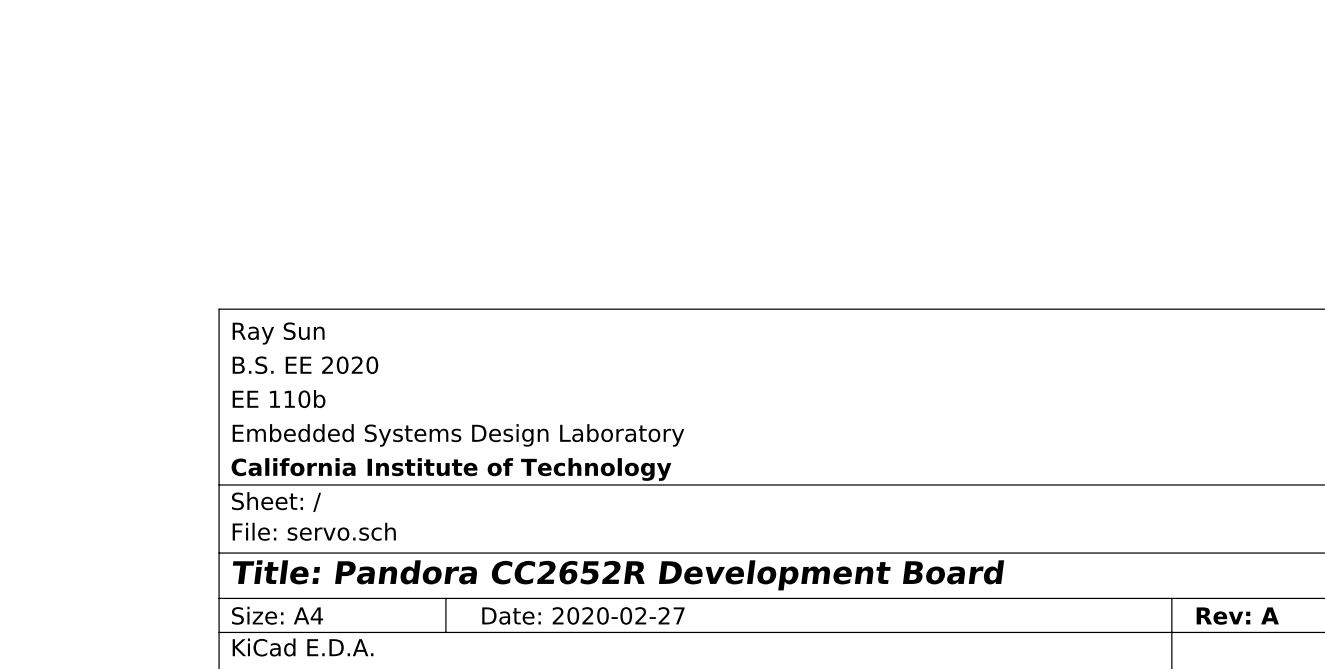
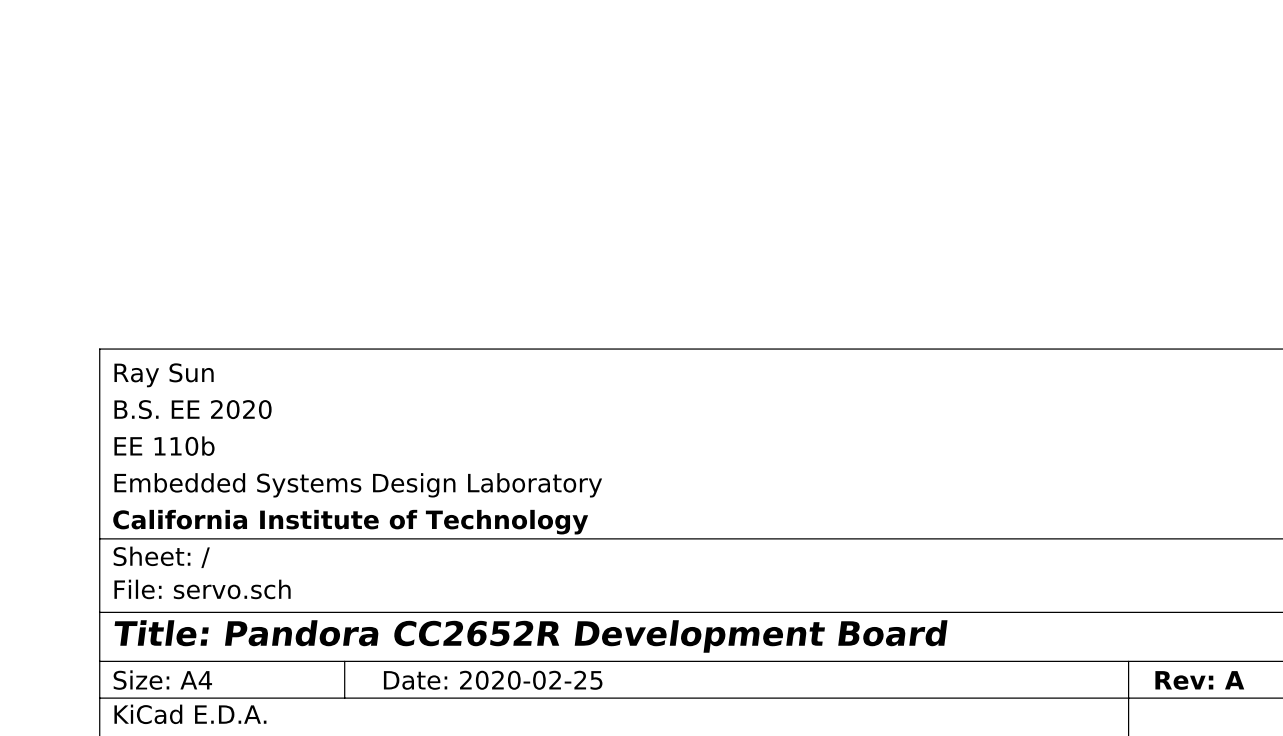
title block: Date: 2020-02-27 (583, 615) -> Date: 2020-02-25 (493, 680)

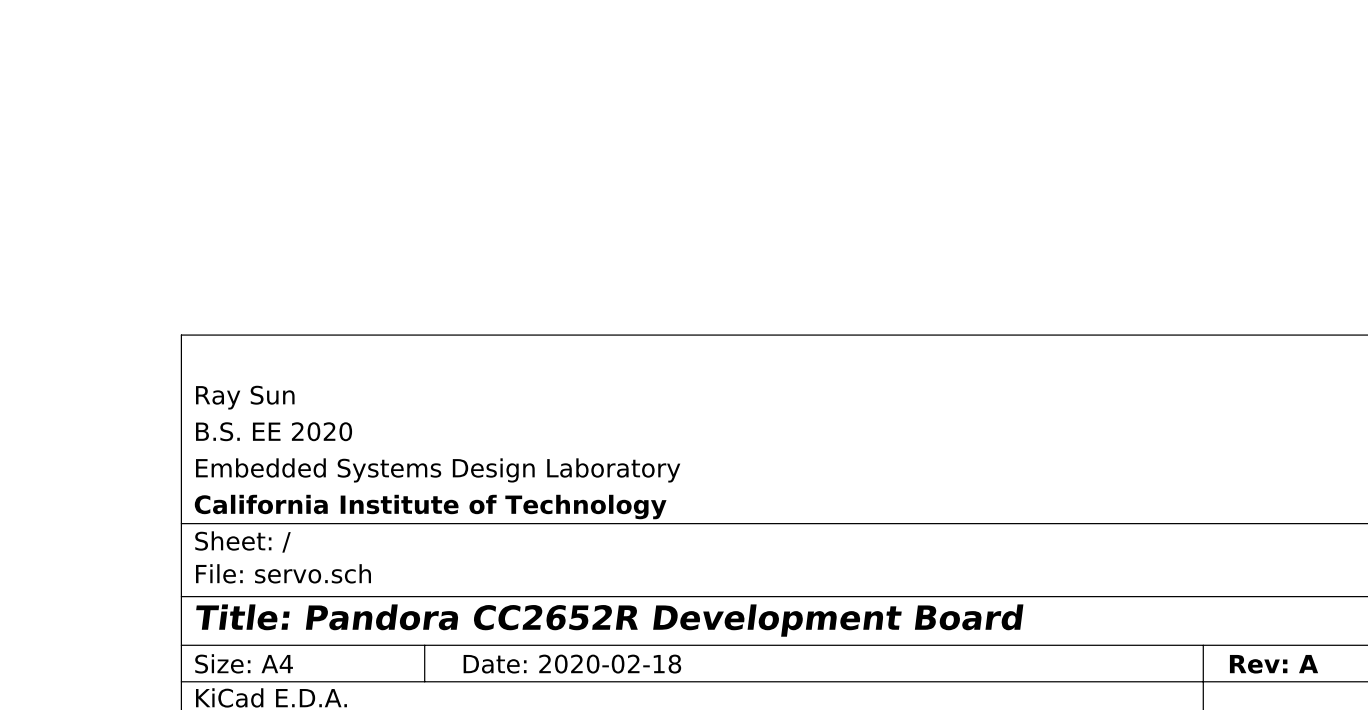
title block: Ray Sun (164, 375) -> none
title block: B.S. EE 2020 (193, 409) -> Ray Sun (245, 397)
title block: EE 110b (164, 446) -> B.S. EE 2020 (274, 431)
title block: Date: 2020-02-25 (493, 680) -> Date: 2020-02-18 (572, 664)

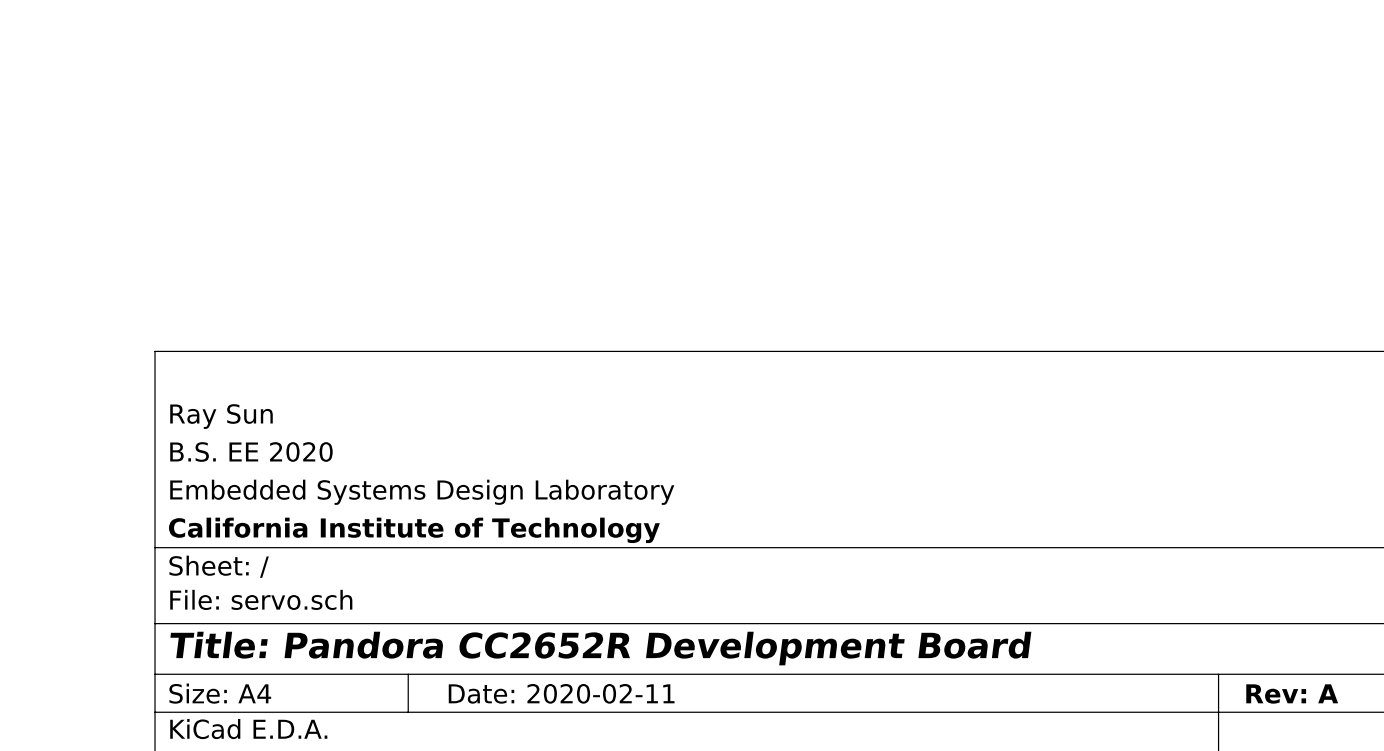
title block: Date: 2020-02-18 (572, 664) -> Date: 2020-02-11 (561, 693)

